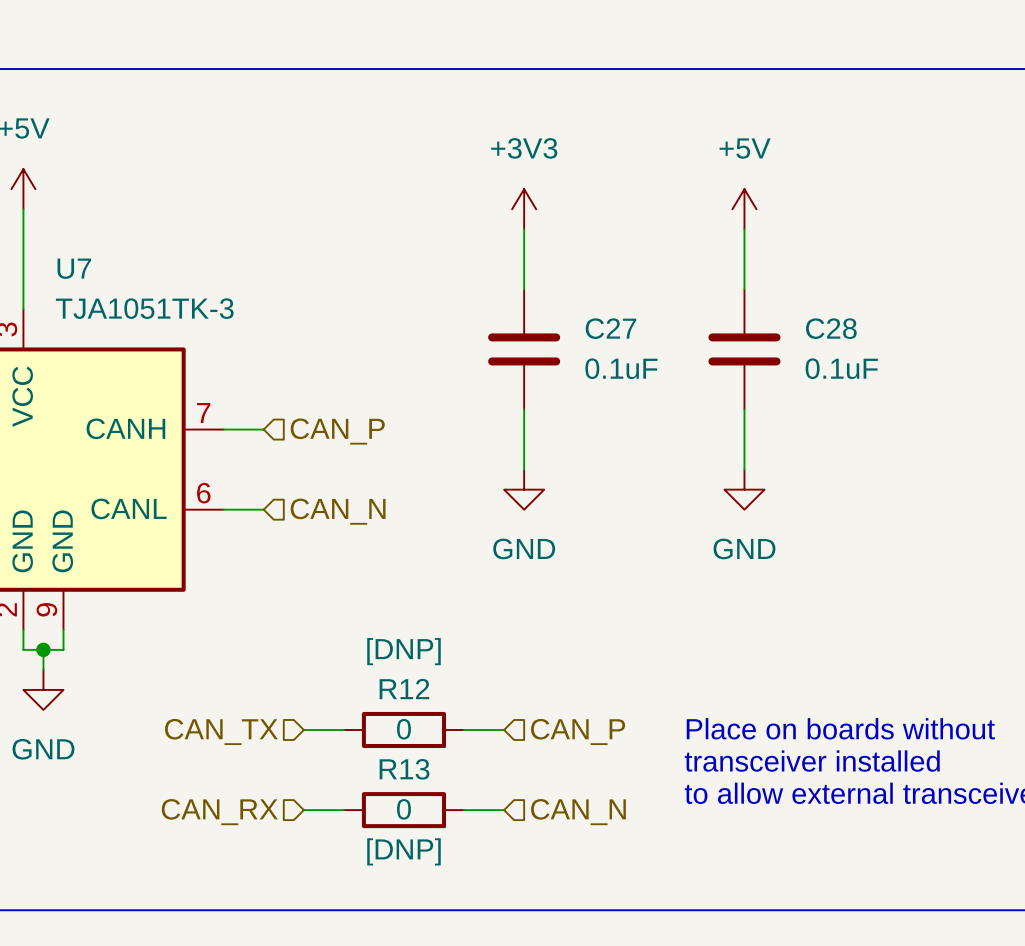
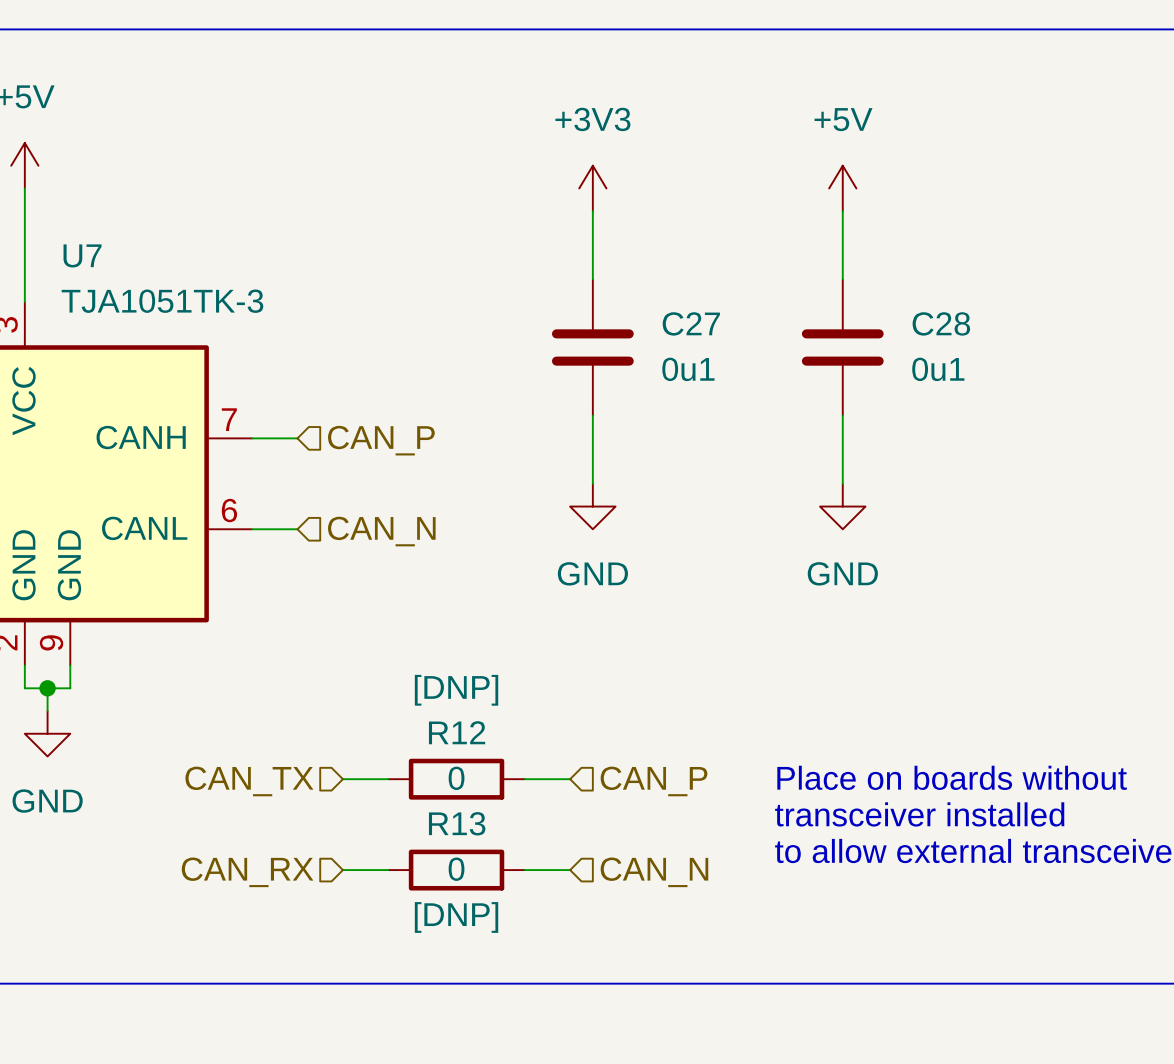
C27 value: 0.1uF (621, 368) -> 0u1 (688, 369)
C28 value: 0.1uF (841, 368) -> 0u1 (938, 369)

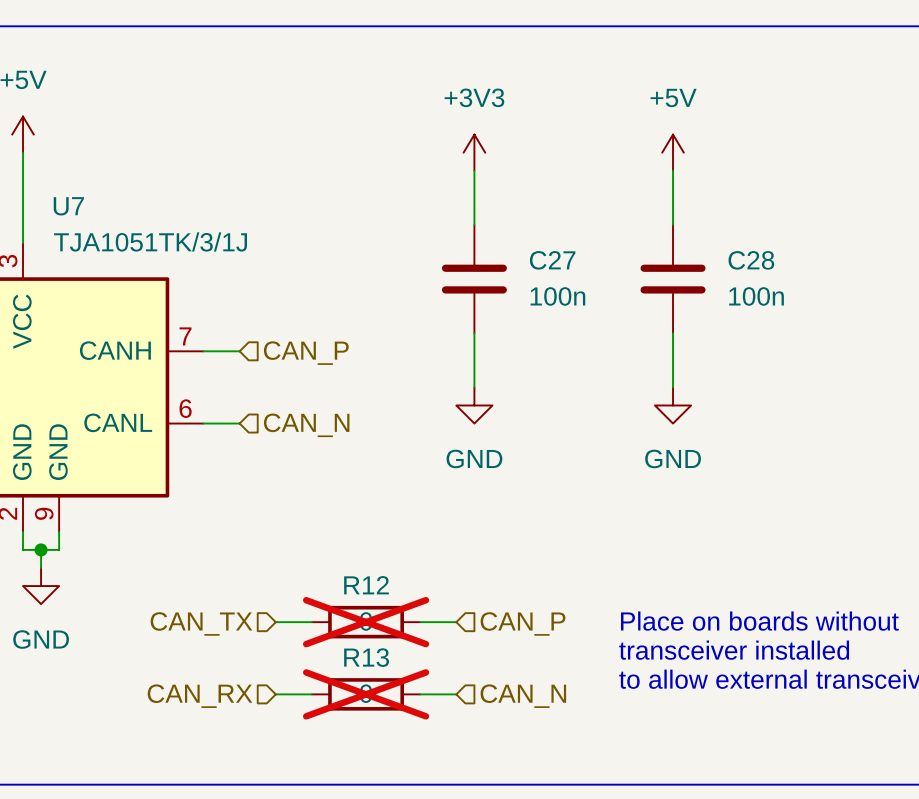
U7 value: TJA1051TK-3 (162, 301) -> TJA1051TK/3/1J (150, 241)
C27 value: 0u1 (688, 369) -> 100n (557, 296)
C28 value: 0u1 (938, 369) -> 100n (756, 296)
R12 text: [DNP] (456, 690) -> none
R12 do-not-place cross: none -> (366, 622)
R13 do-not-place cross: none -> (366, 694)
R13 text: [DNP] (456, 917) -> none

